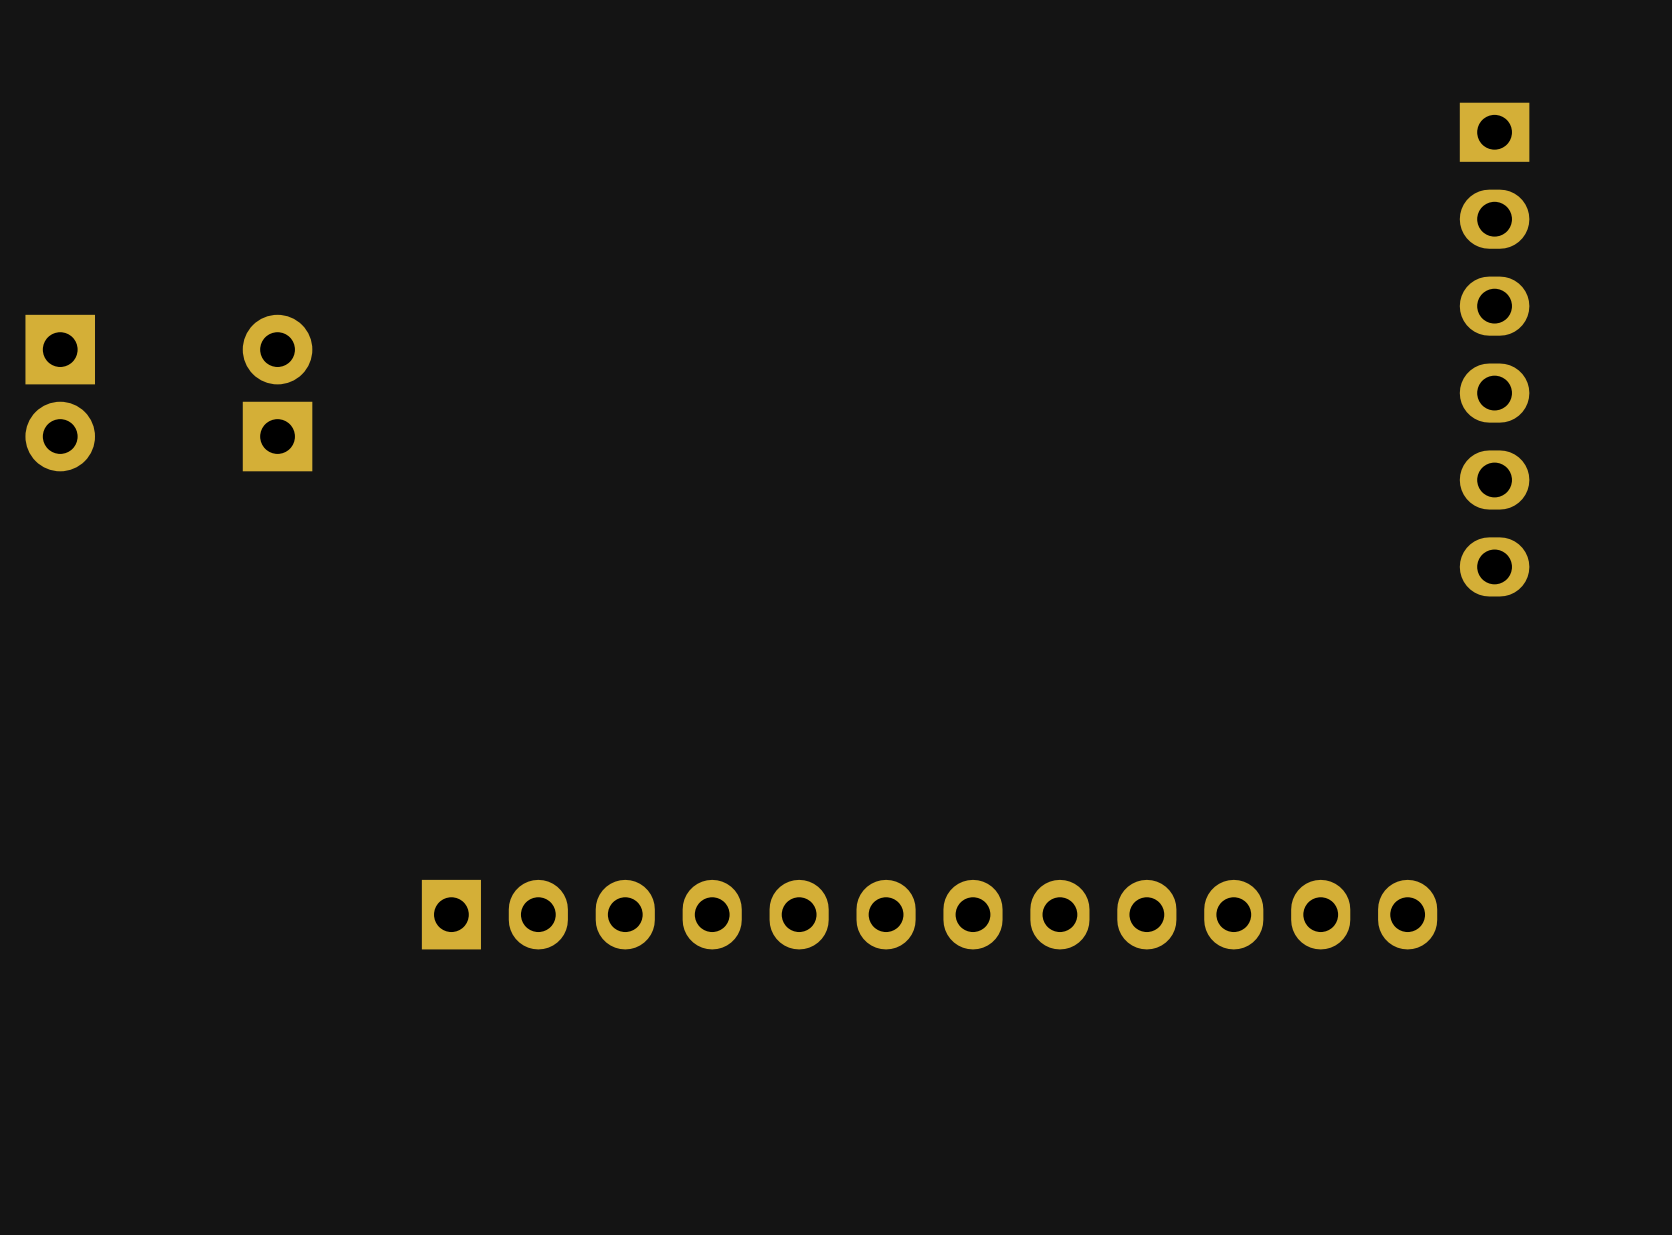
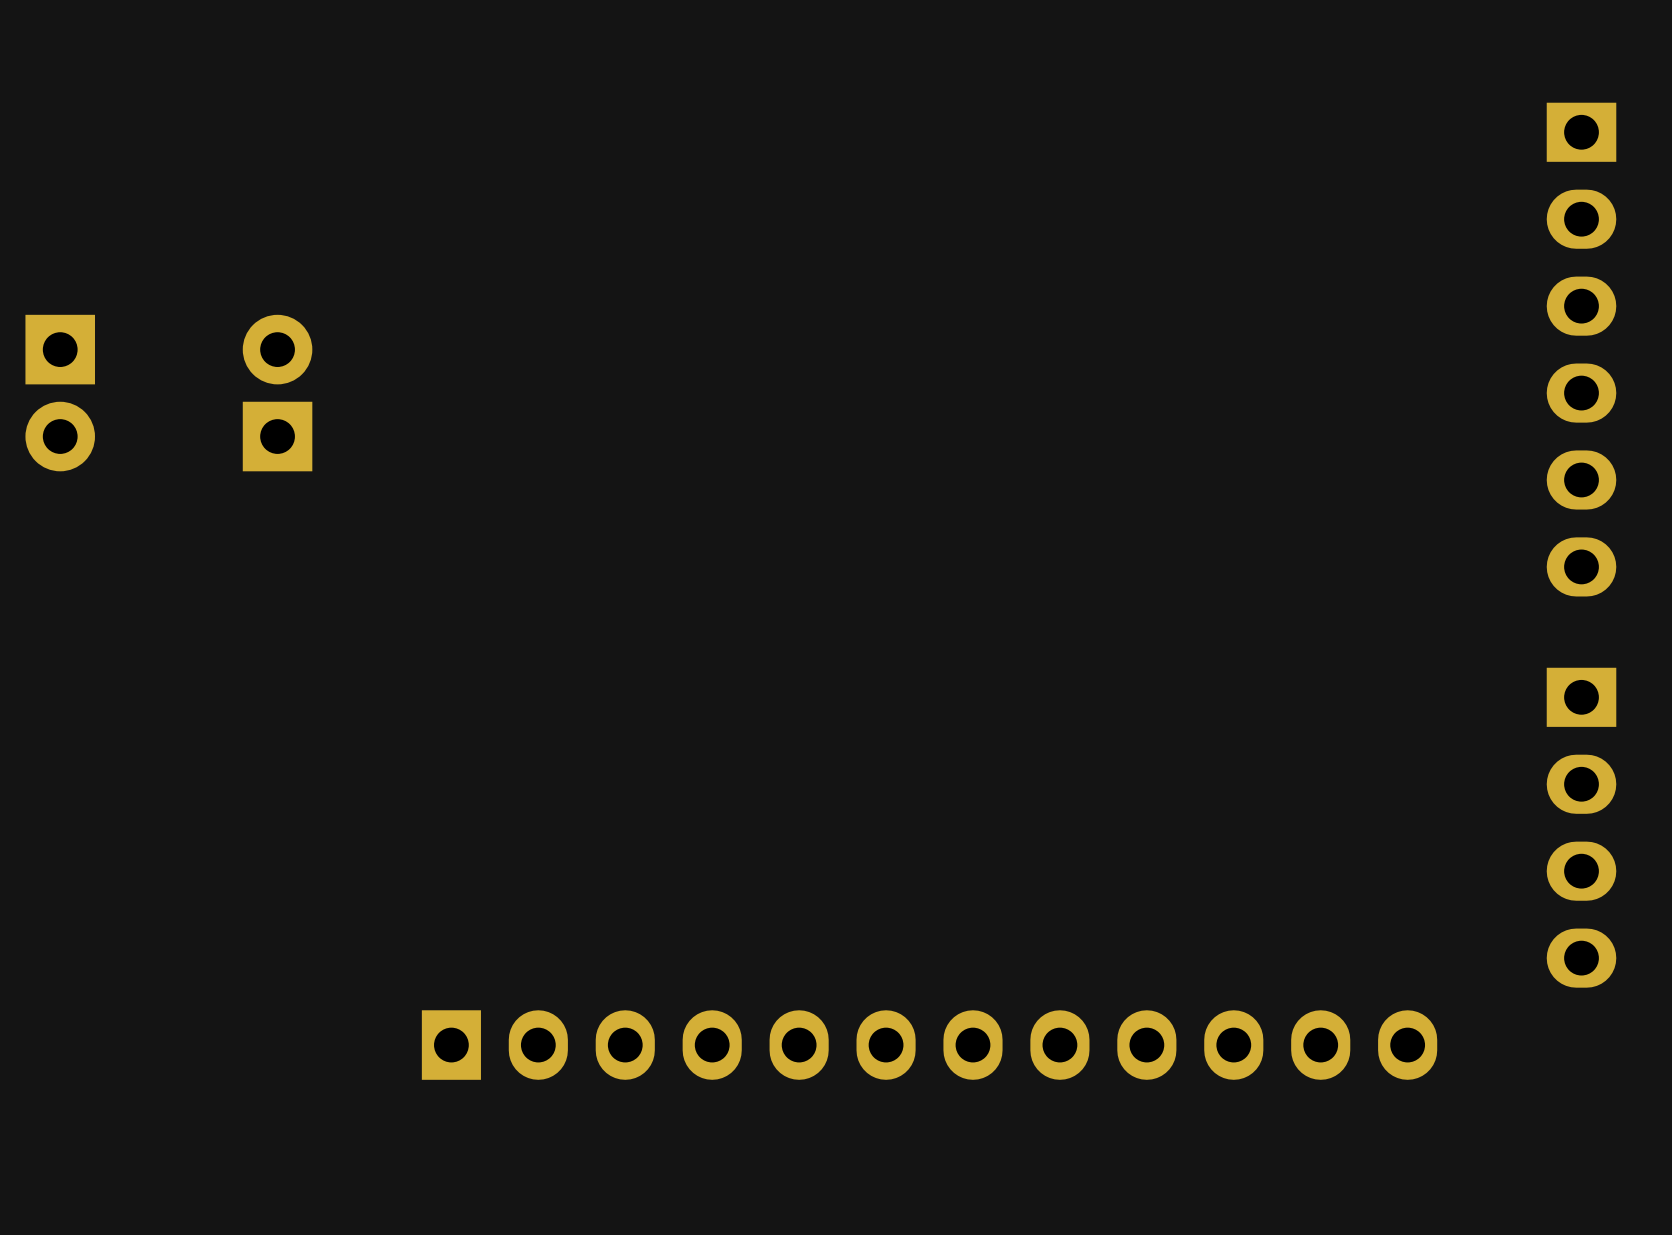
part position: (1494, 349) -> (1581, 349)
part: none -> (1581, 827)
part position: (929, 914) -> (929, 1045)

